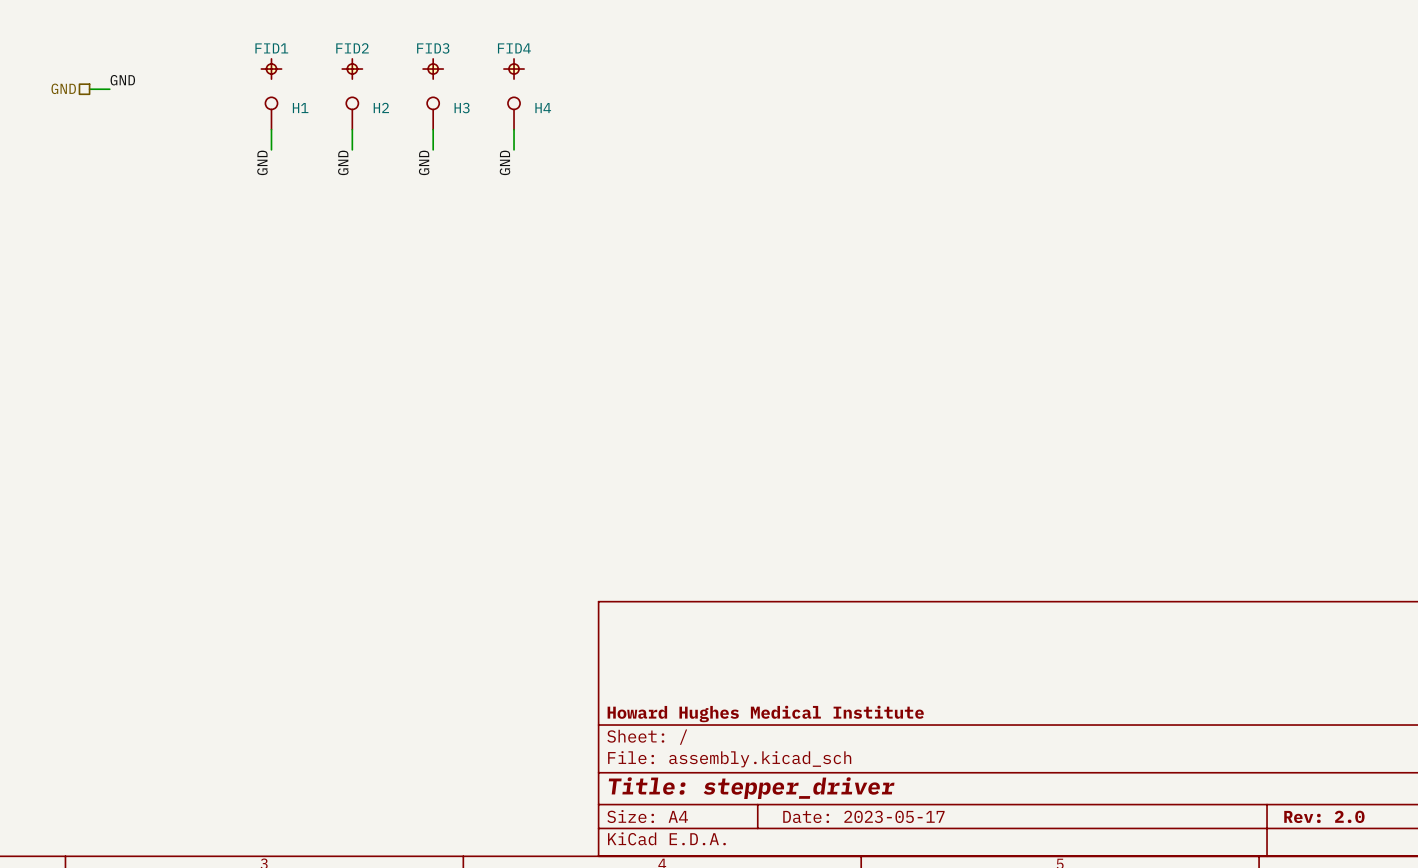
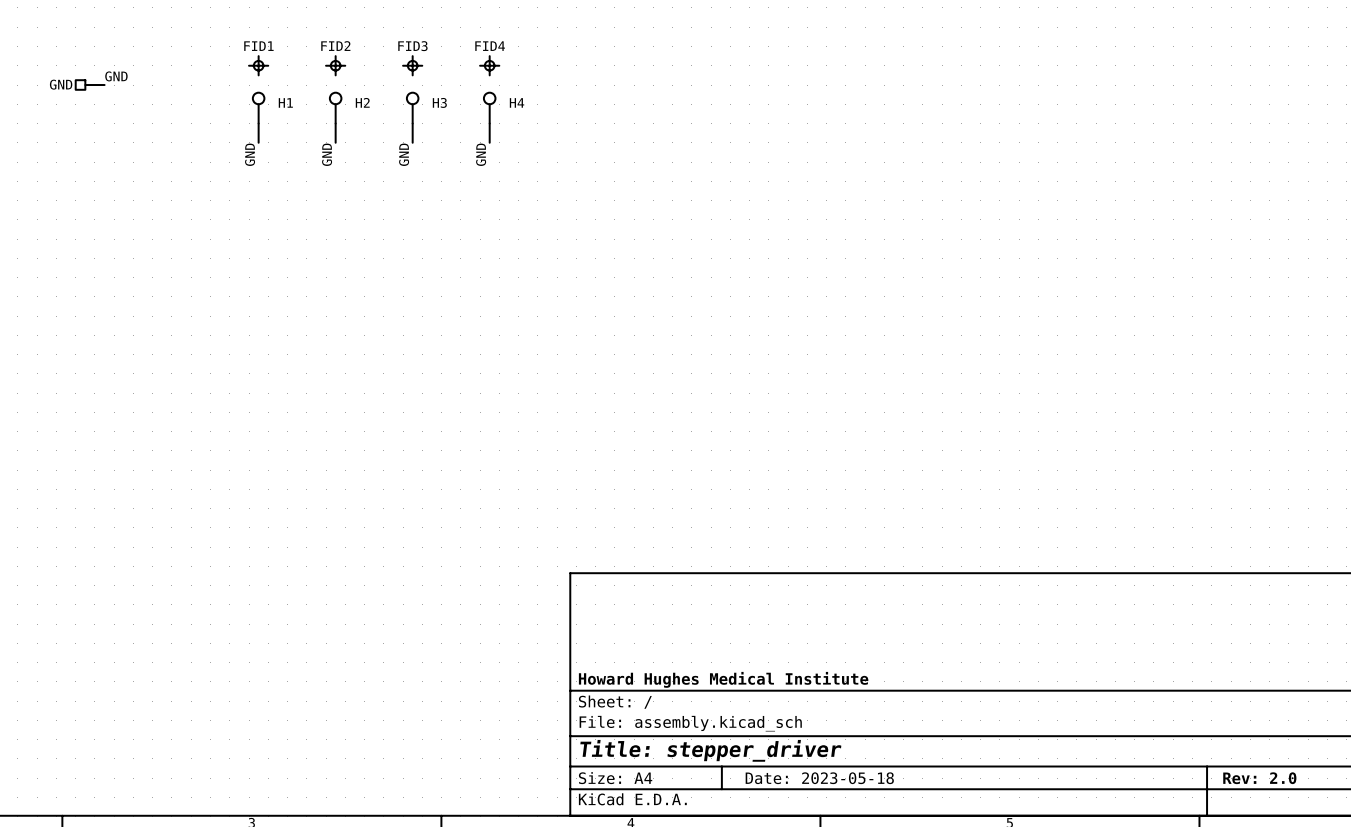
title block: Date: 2023-05-17 (863, 816) -> Date: 2023-05-18 (819, 778)

